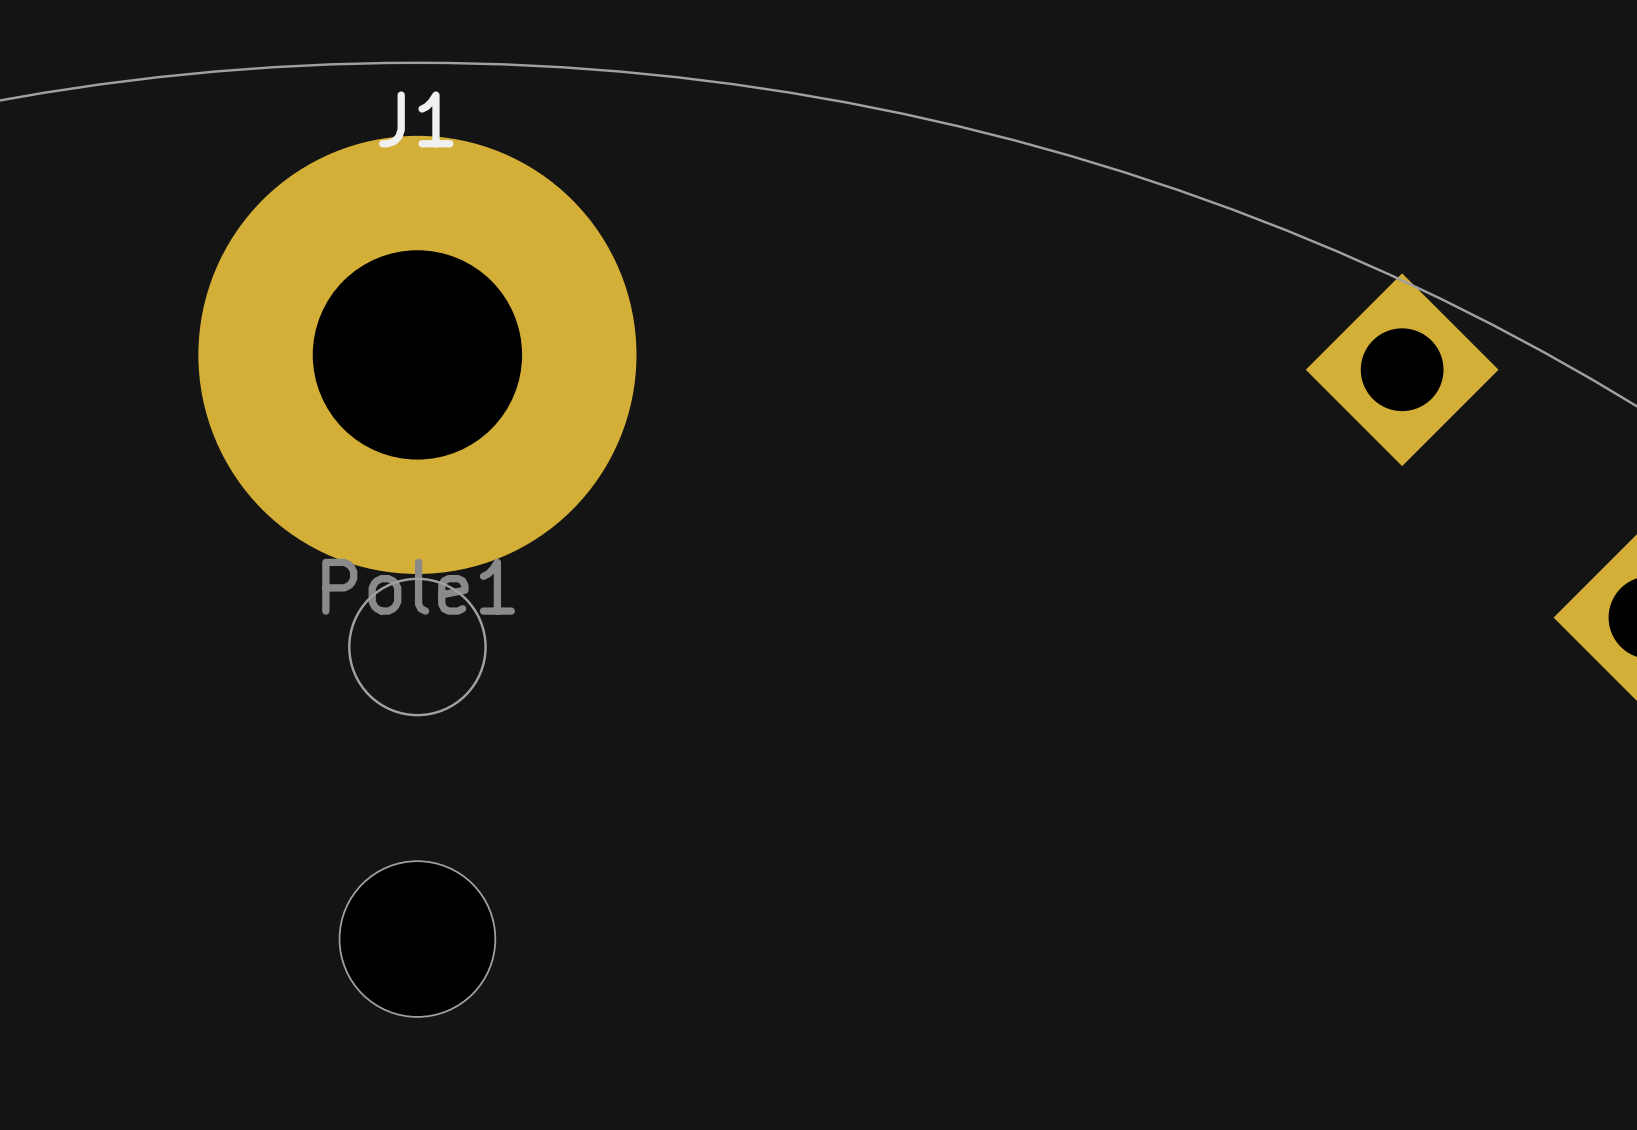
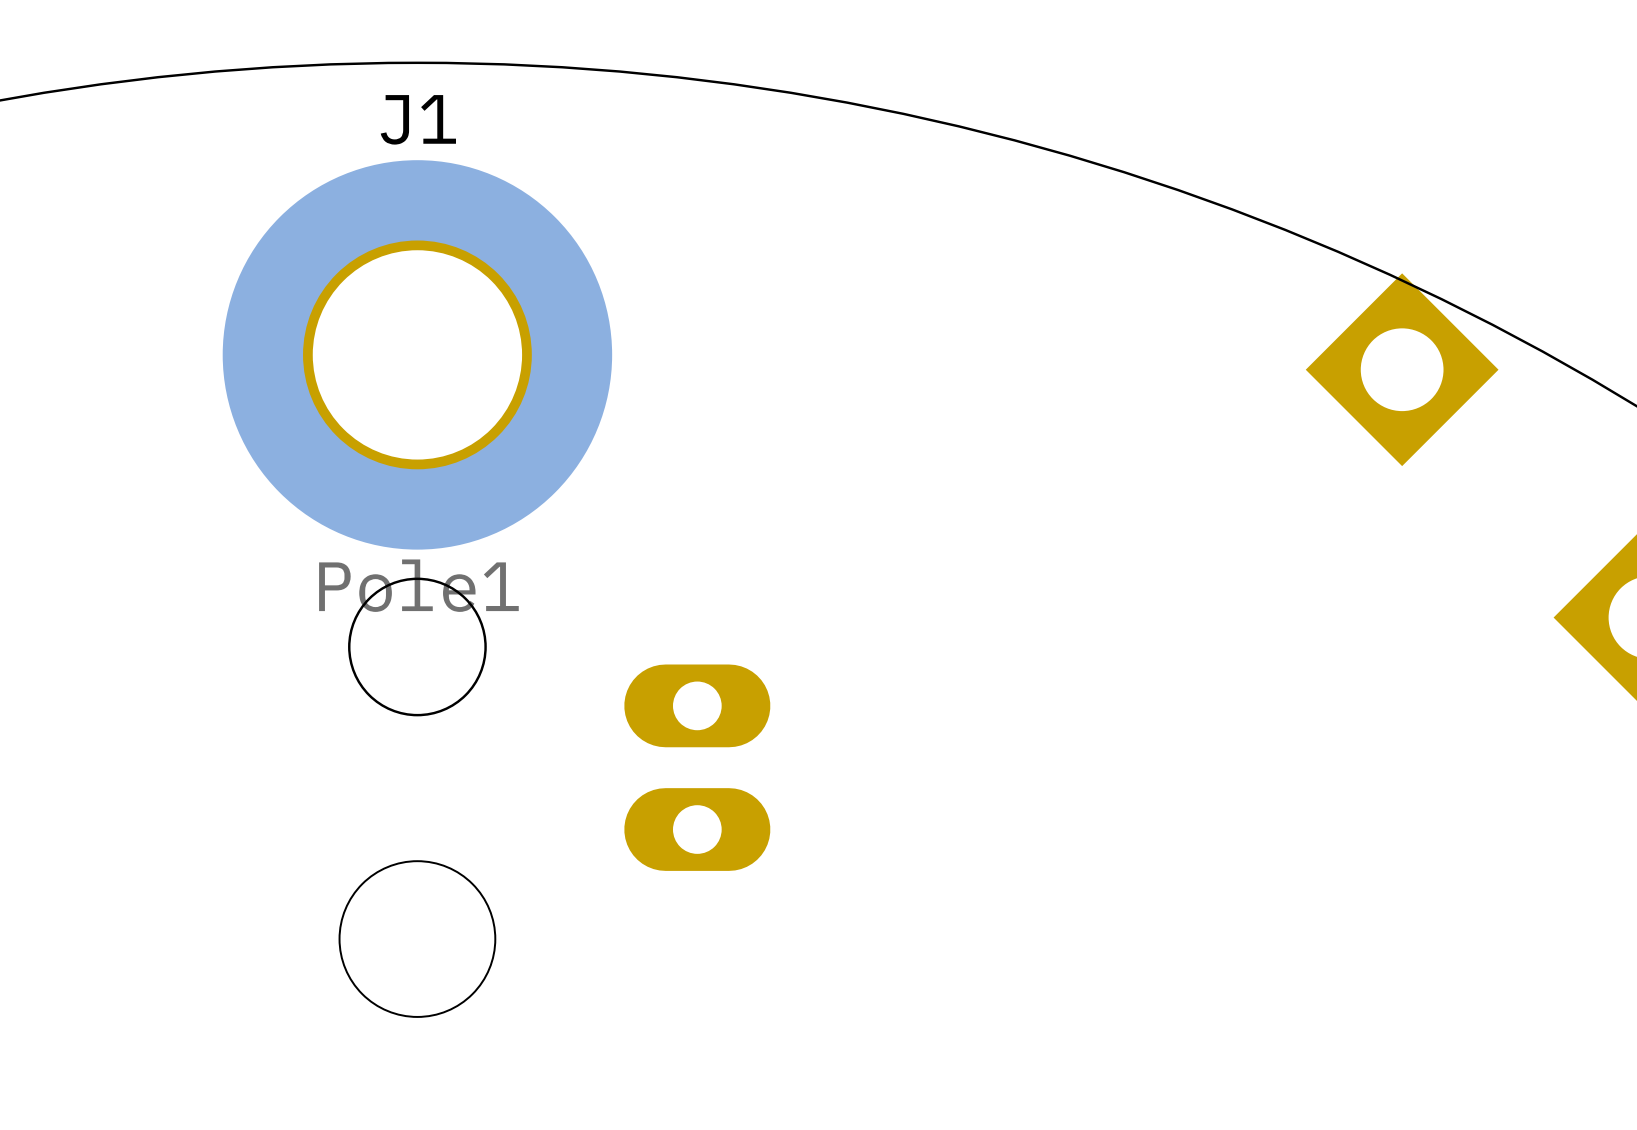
J1 footprint: [198, 135, 637, 717] -> [222, 160, 613, 717]
part: none -> (697, 767)

